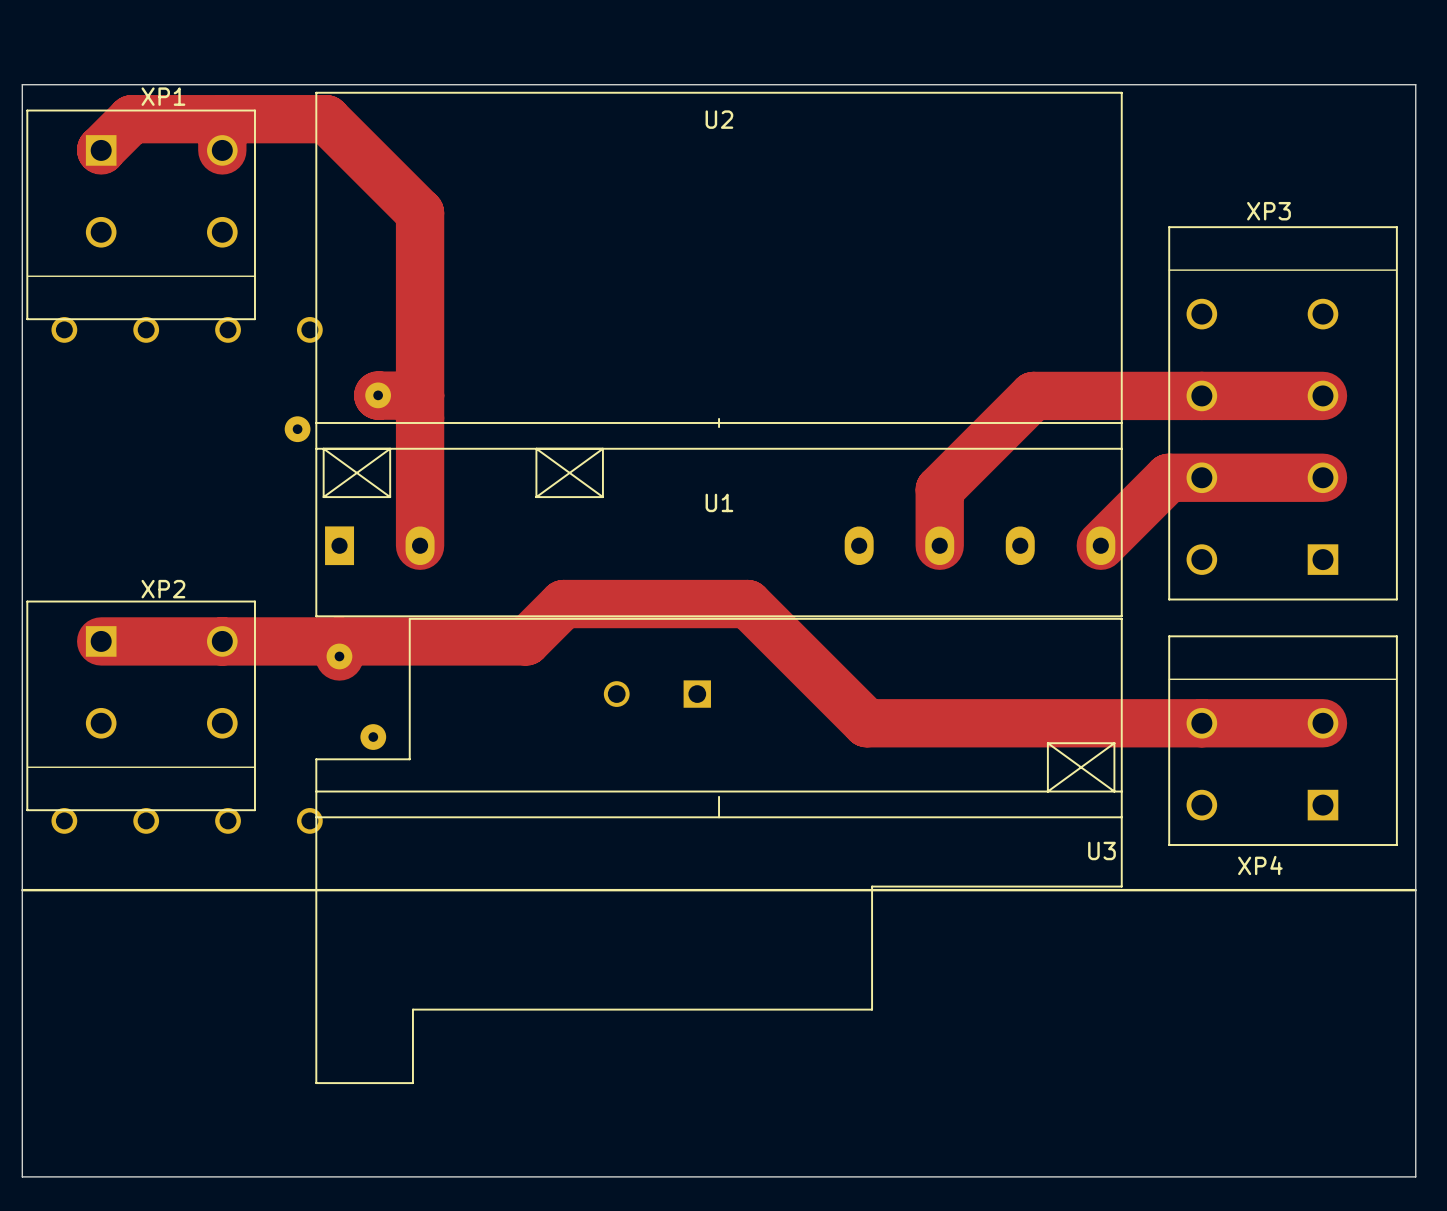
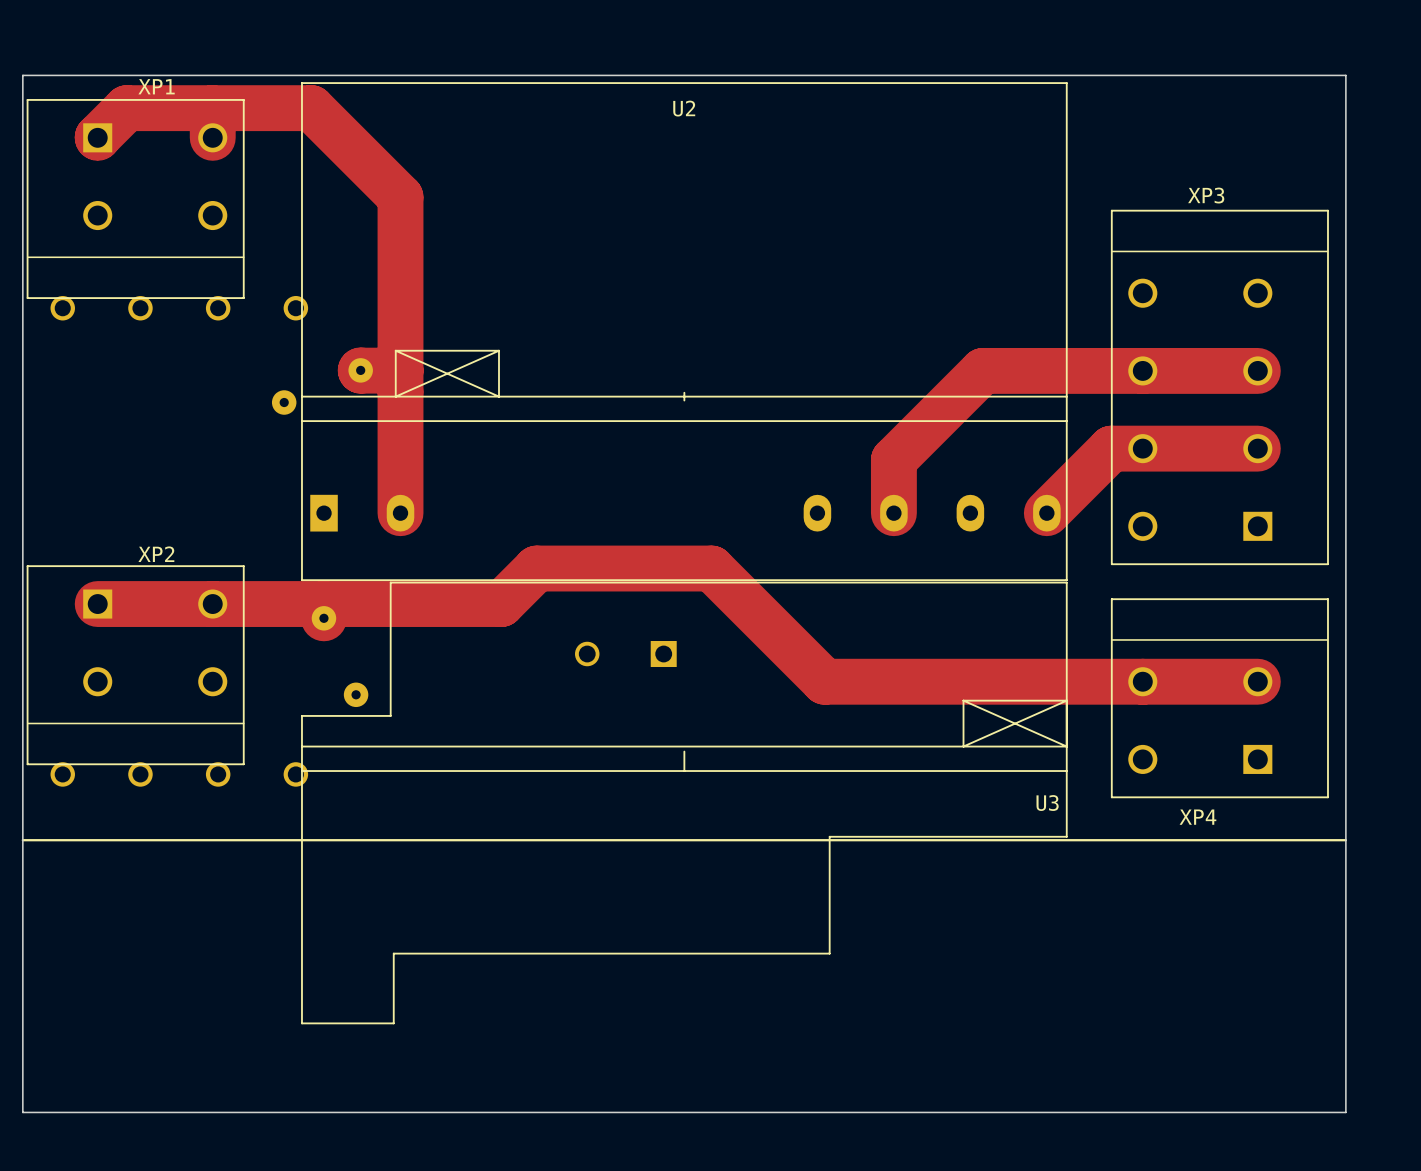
U2 footprint: [315, 91, 1123, 618] -> [301, 82, 1068, 582]
U1: (719, 502) -> none
U3 footprint: [315, 617, 1123, 1085] -> [301, 581, 1068, 1025]

